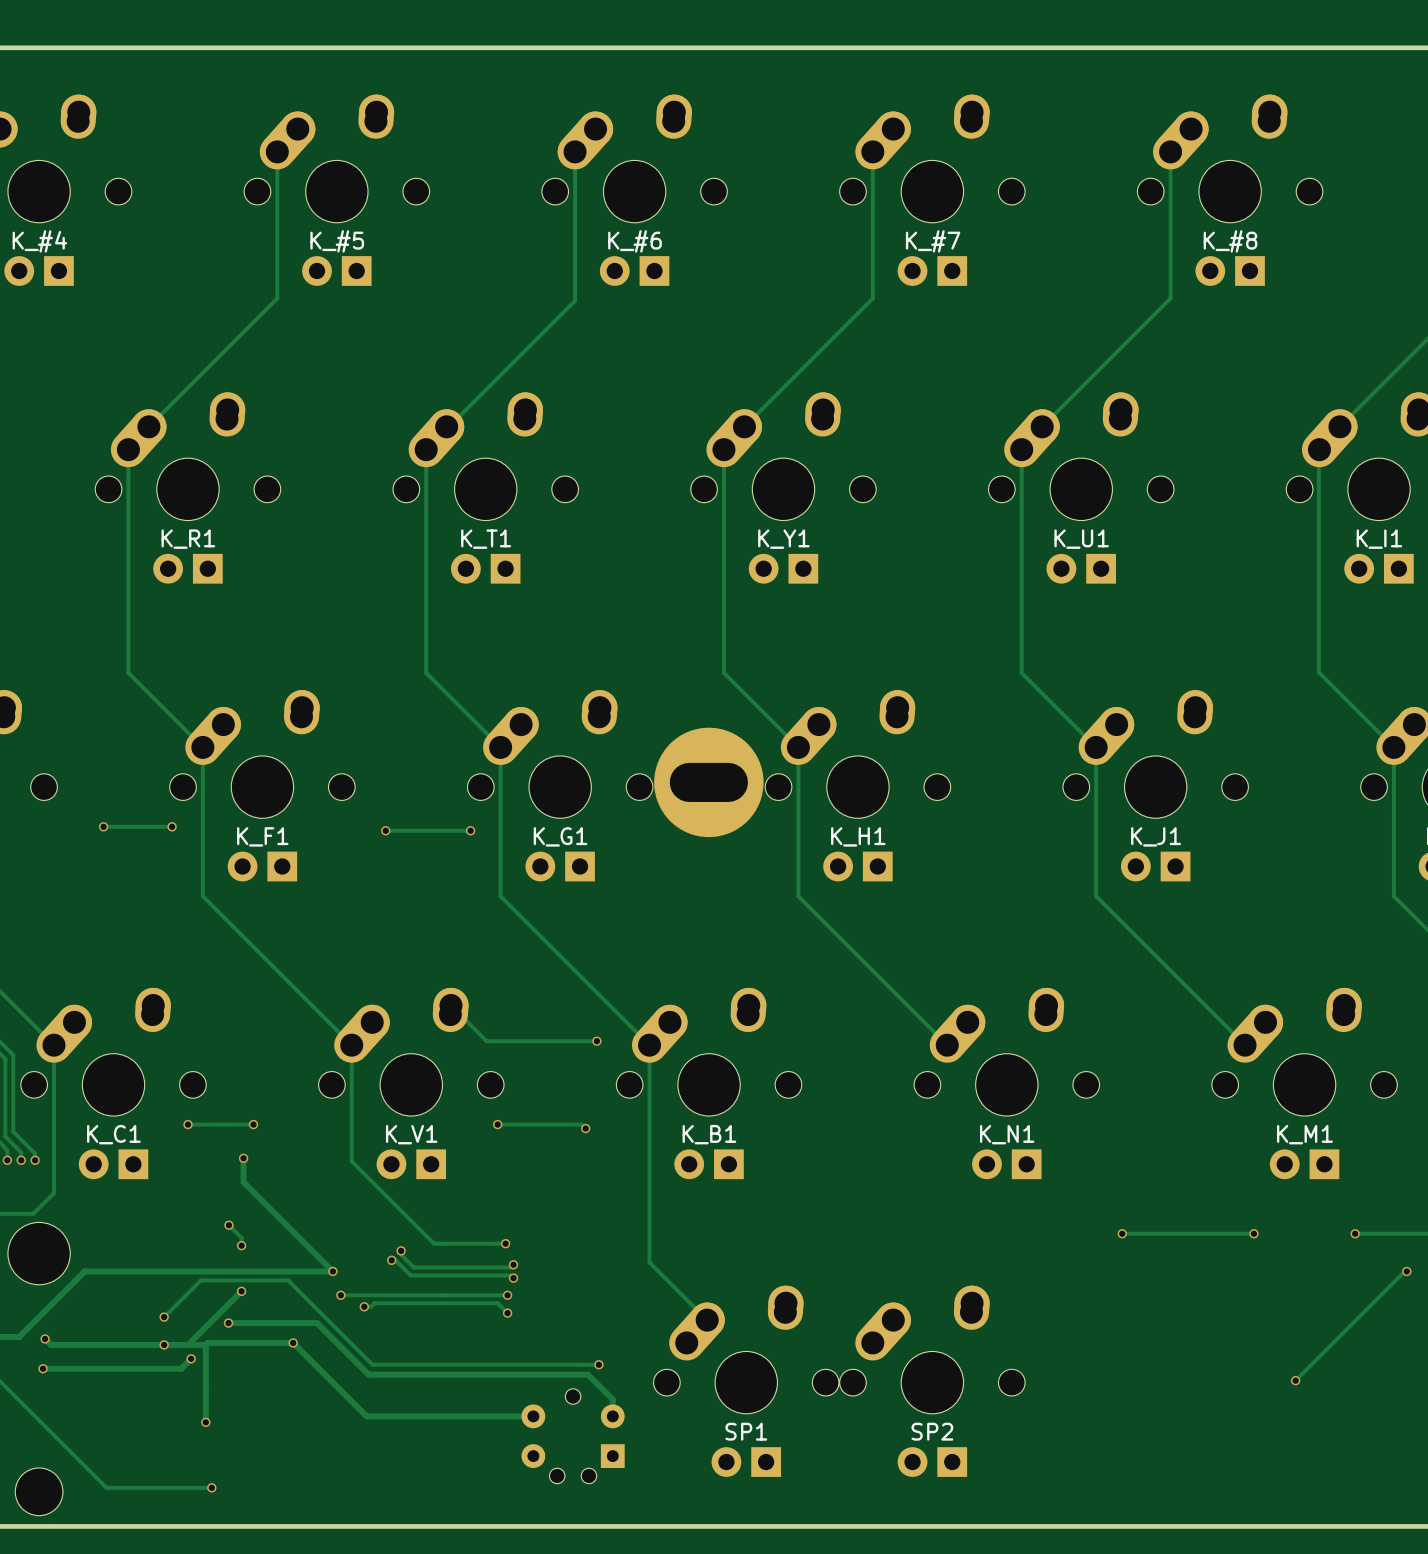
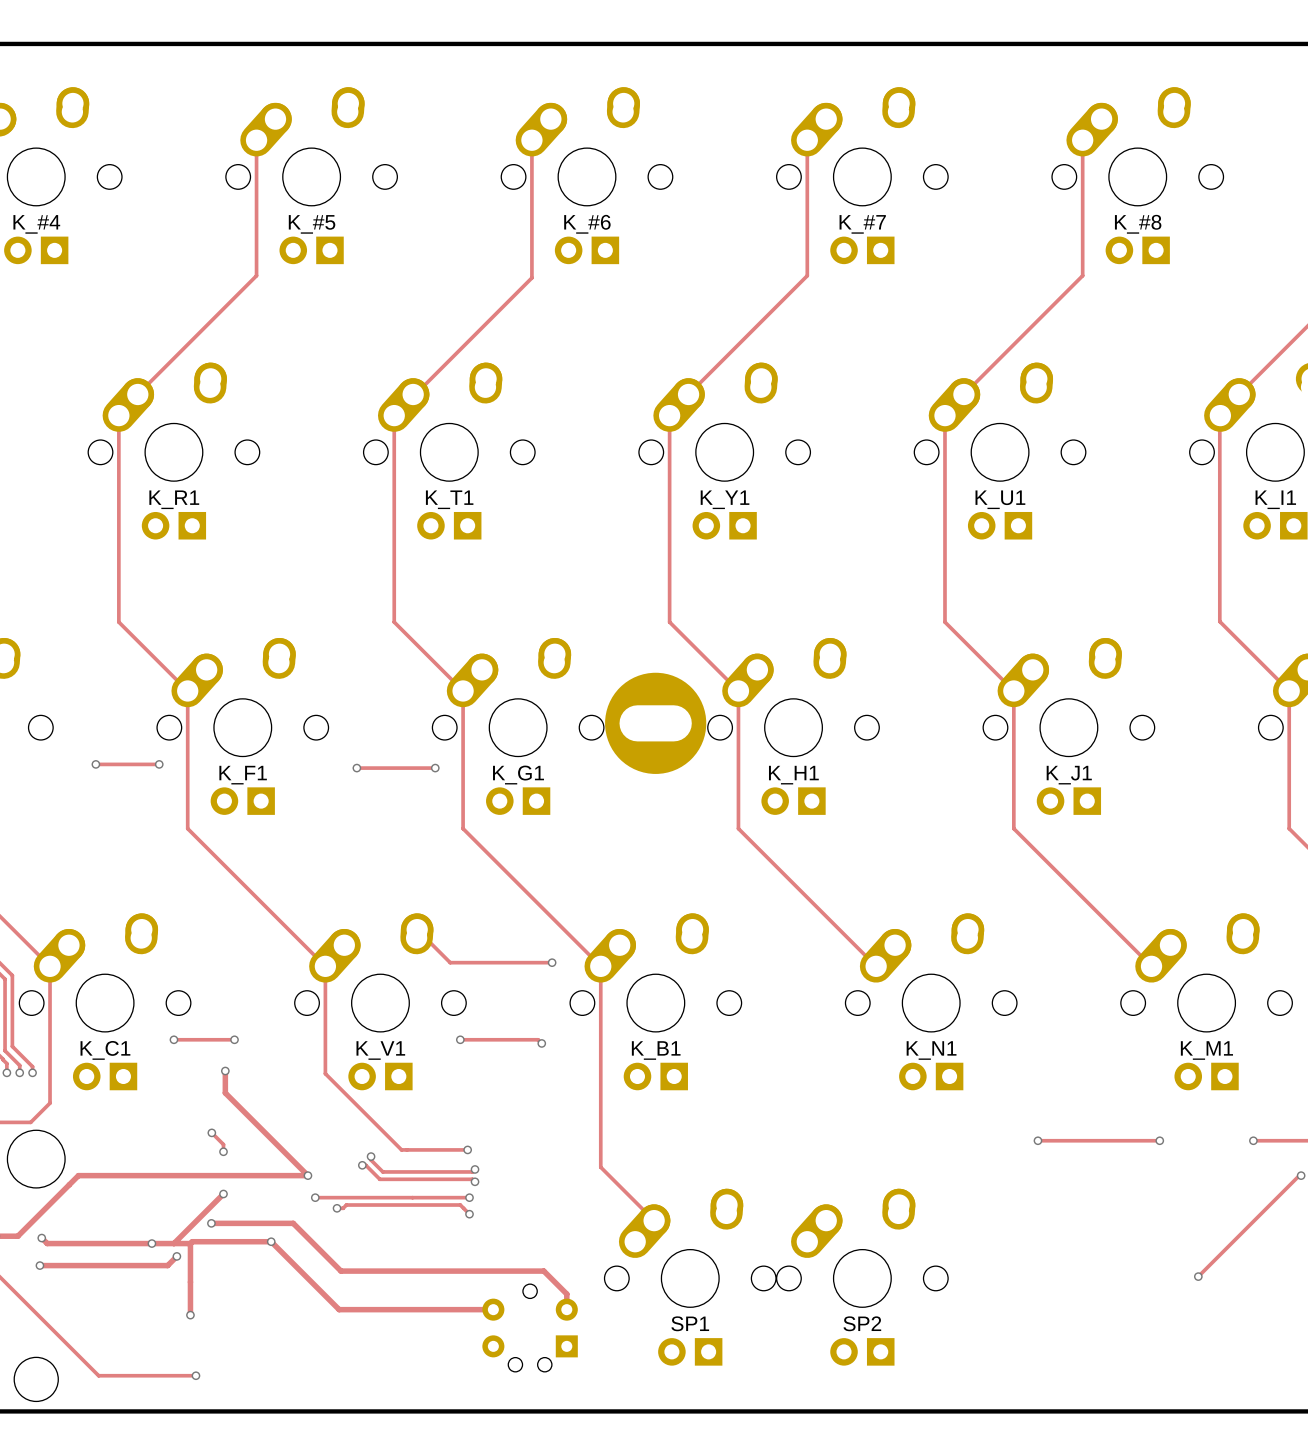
track: (164, 1317) (200, 1280) (288, 1280) (372, 1364) (598, 1364) -> none
via: (164, 1317) -> none
via: (598, 1364) -> none

